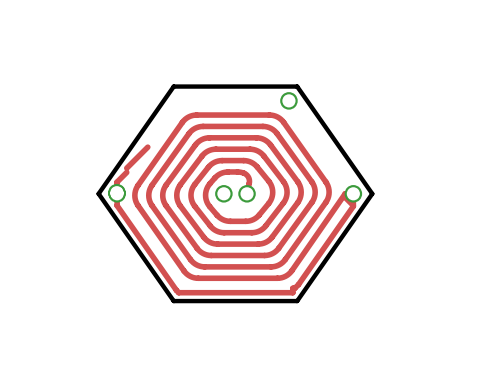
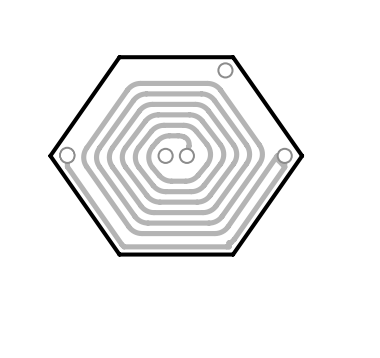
track: (147, 147) (126, 168) -> none
track: (126, 172) (116, 182) (116, 192) -> none

